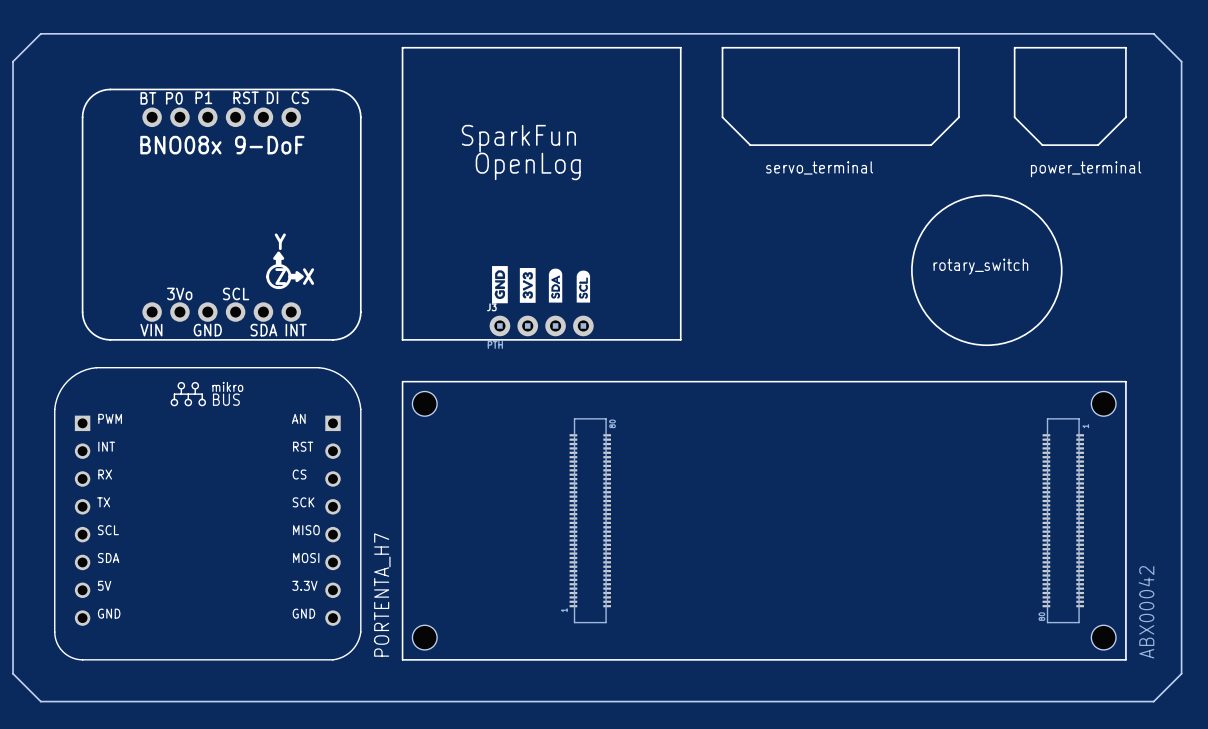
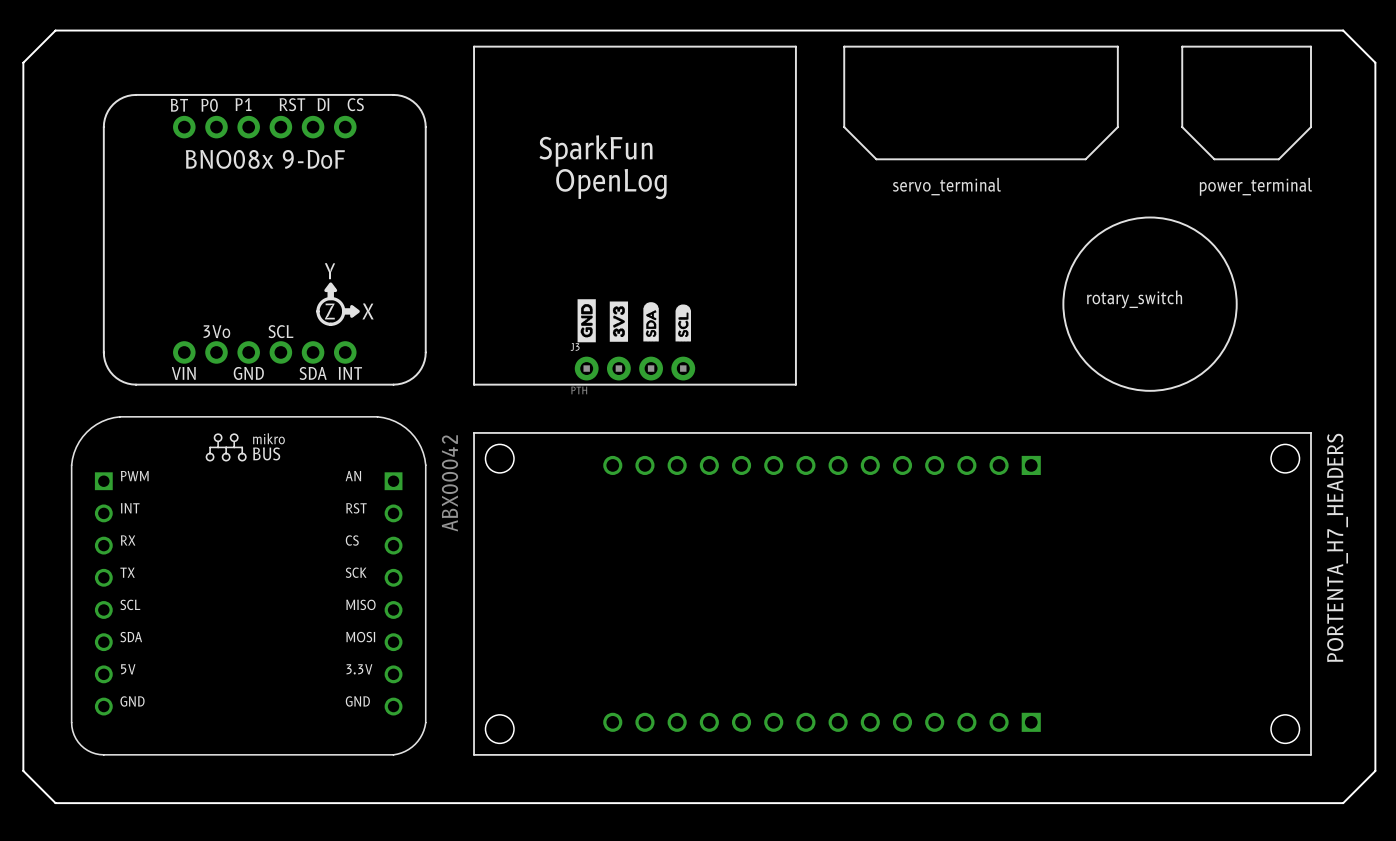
PORTENTA_H7: ABX00042 (764, 520) -> none
part: none -> (892, 593)

